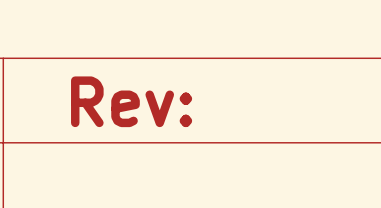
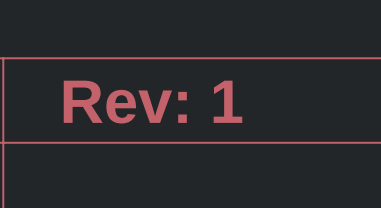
title block: Rev: (131, 101) -> Rev: 1 (152, 102)

